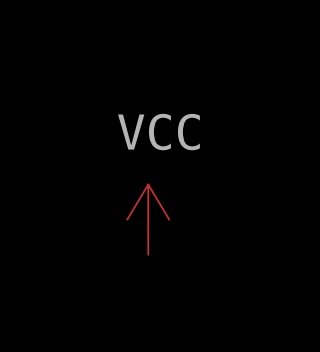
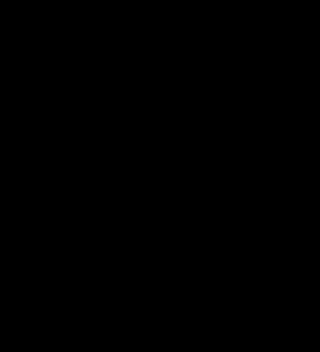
power symbol: VCC (148, 219) -> none

